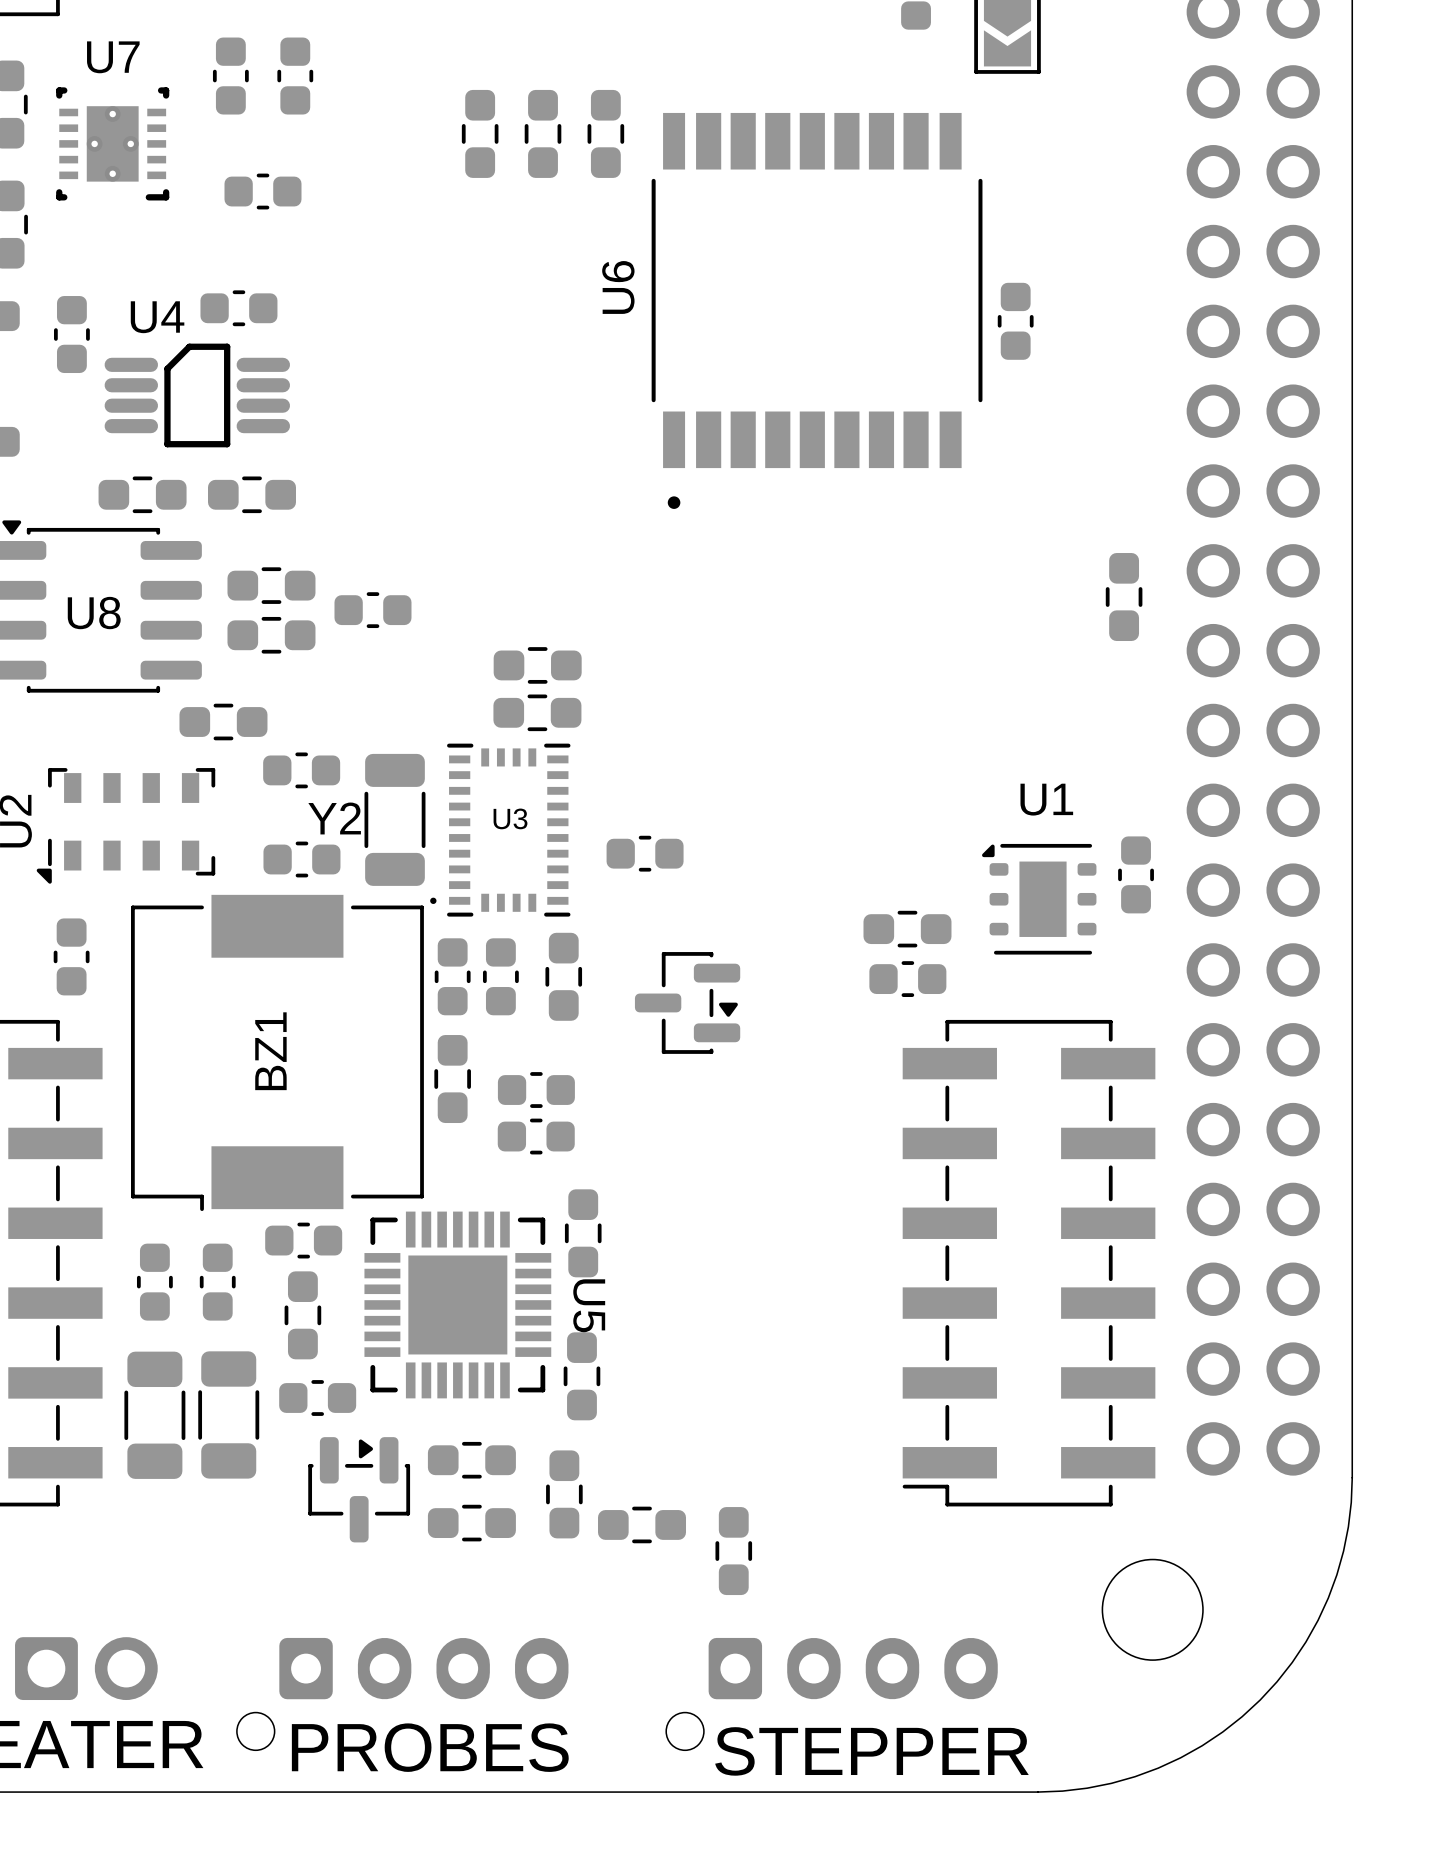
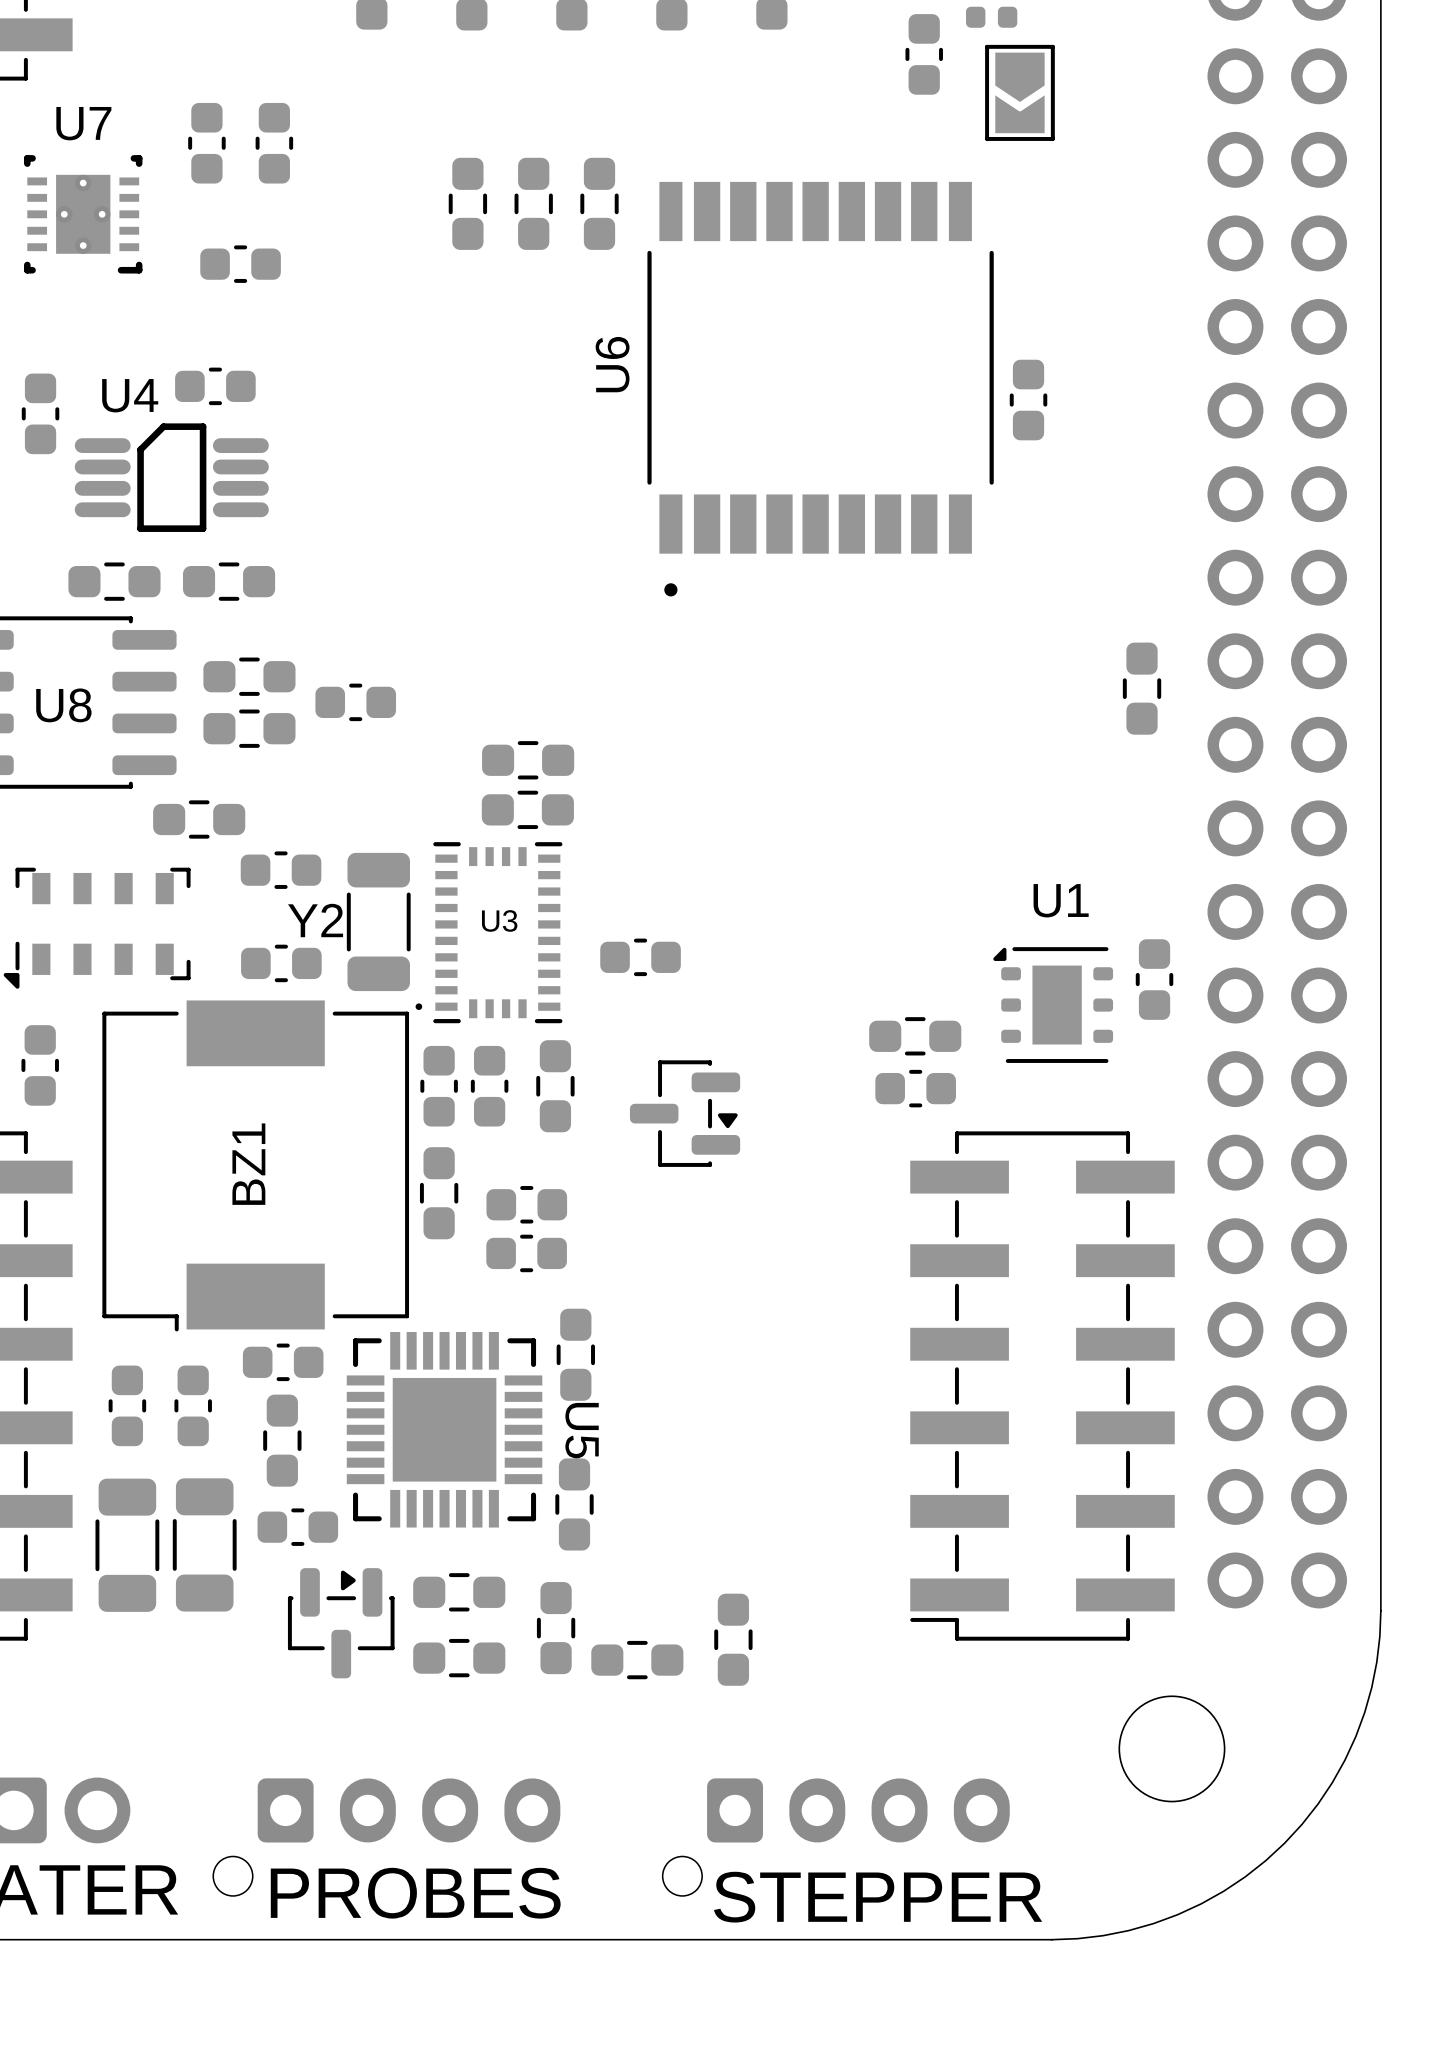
part position: (733, 1551) -> (733, 1639)

